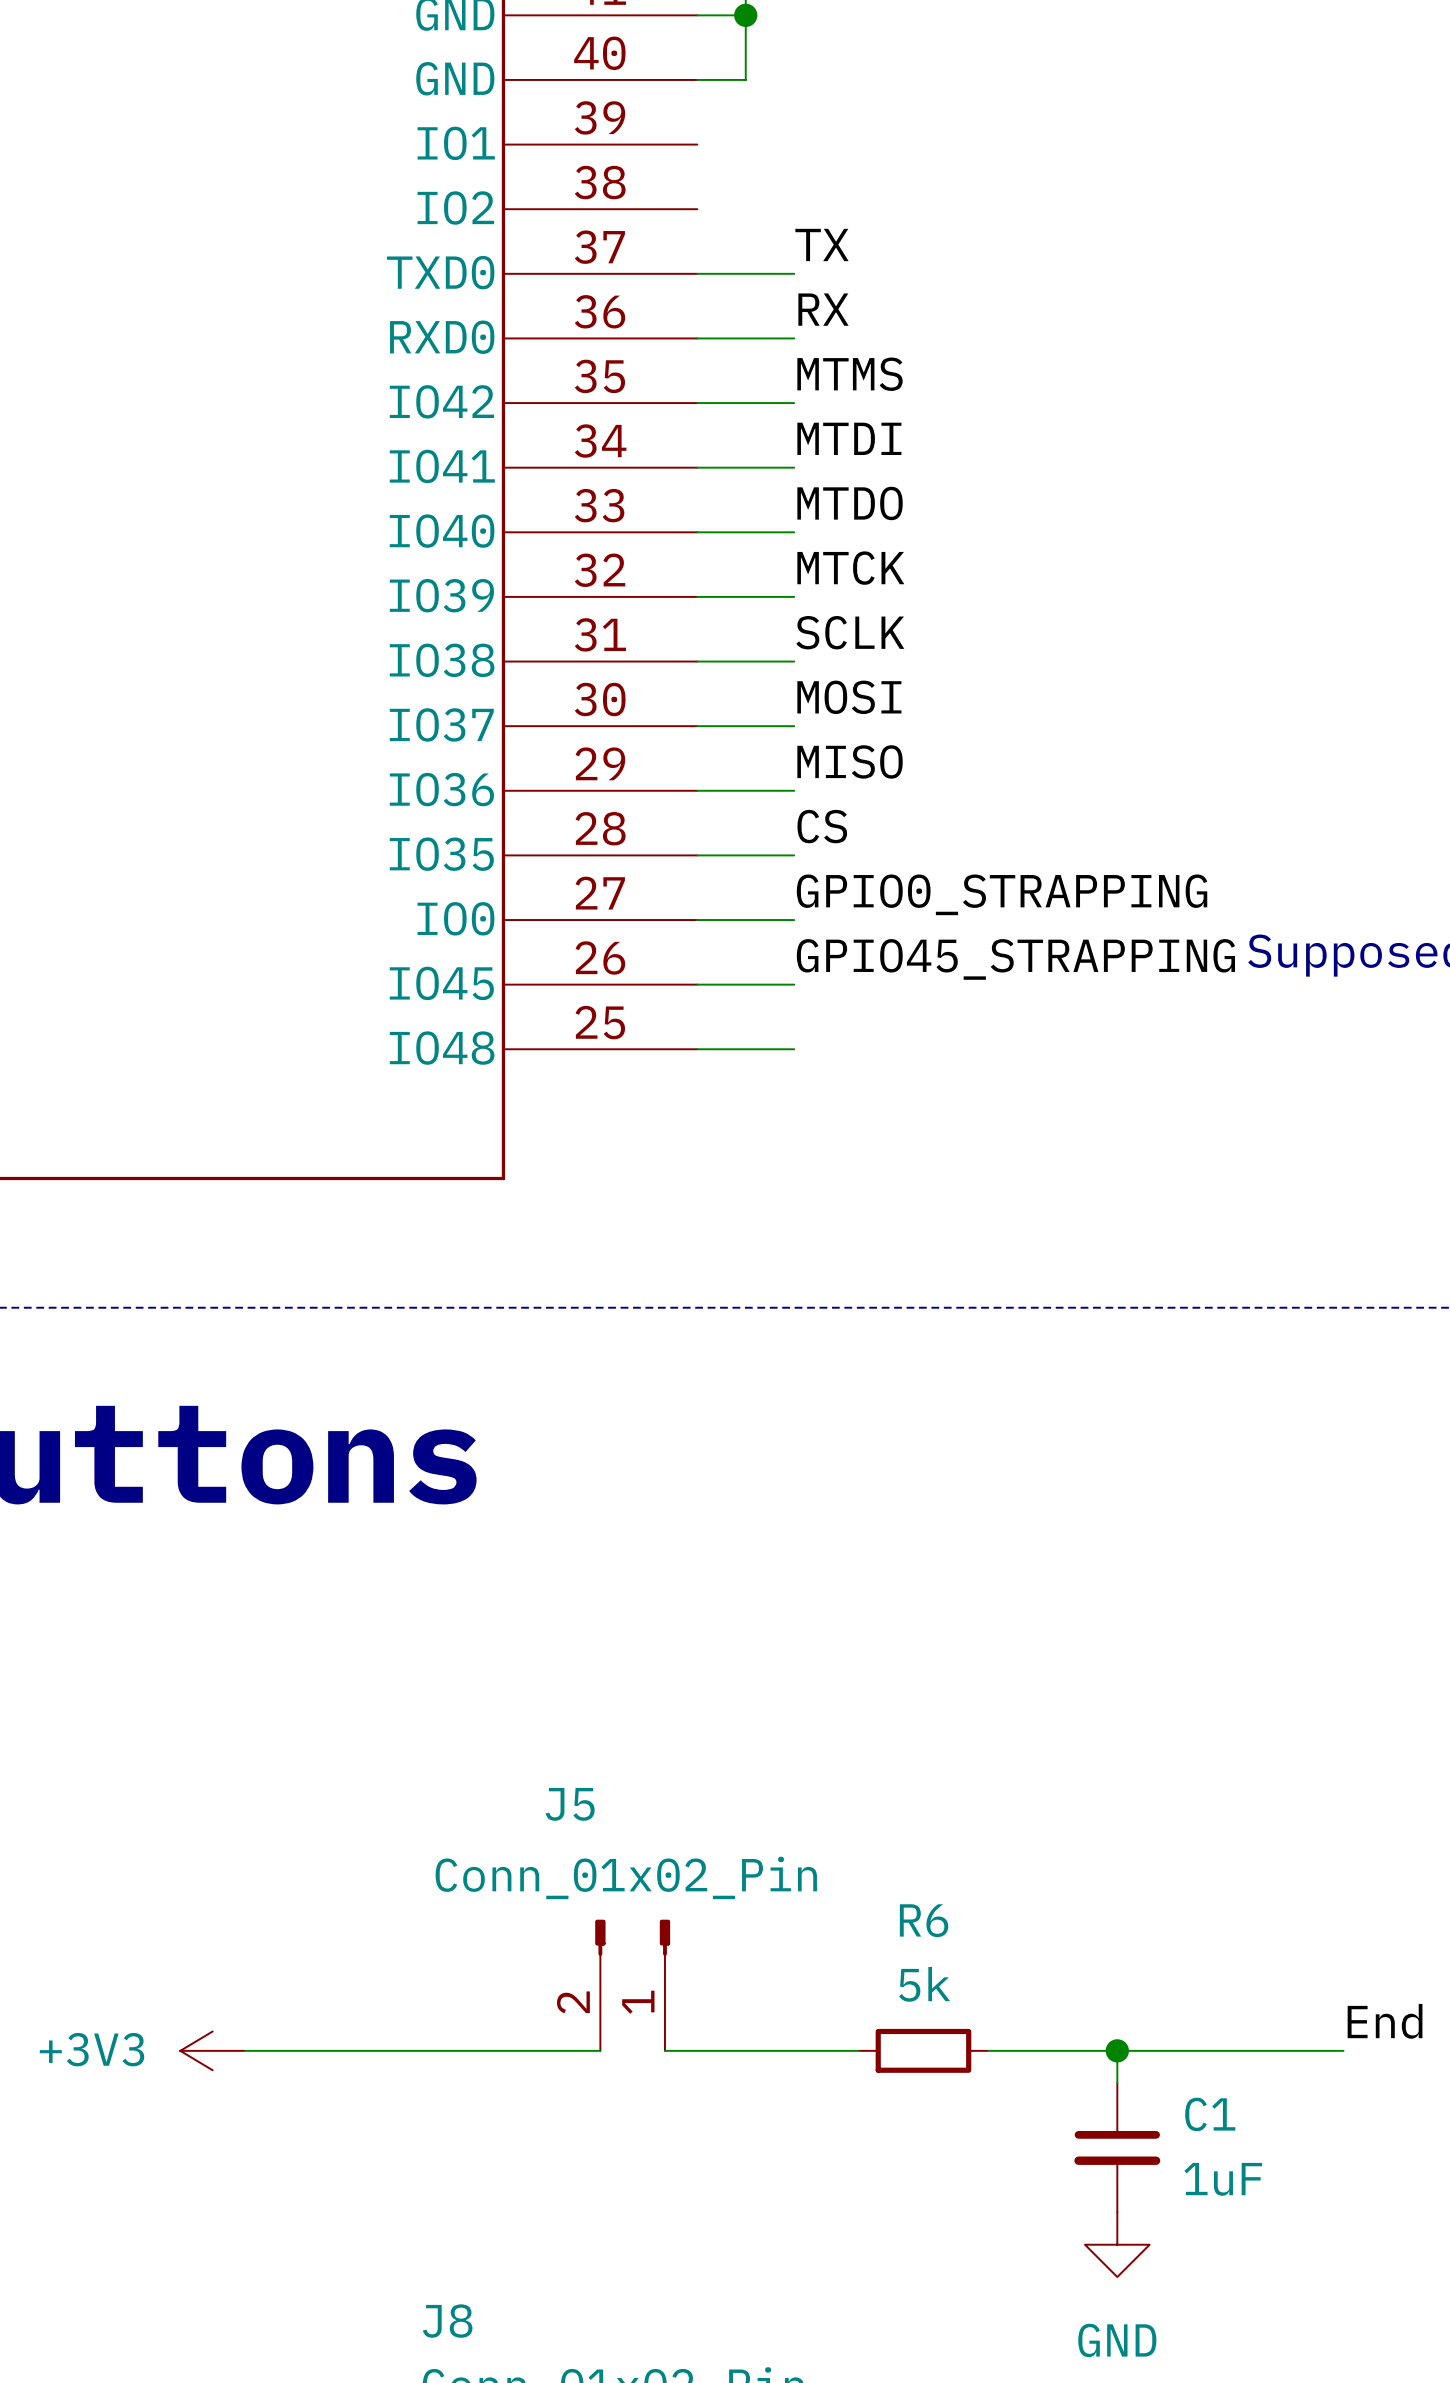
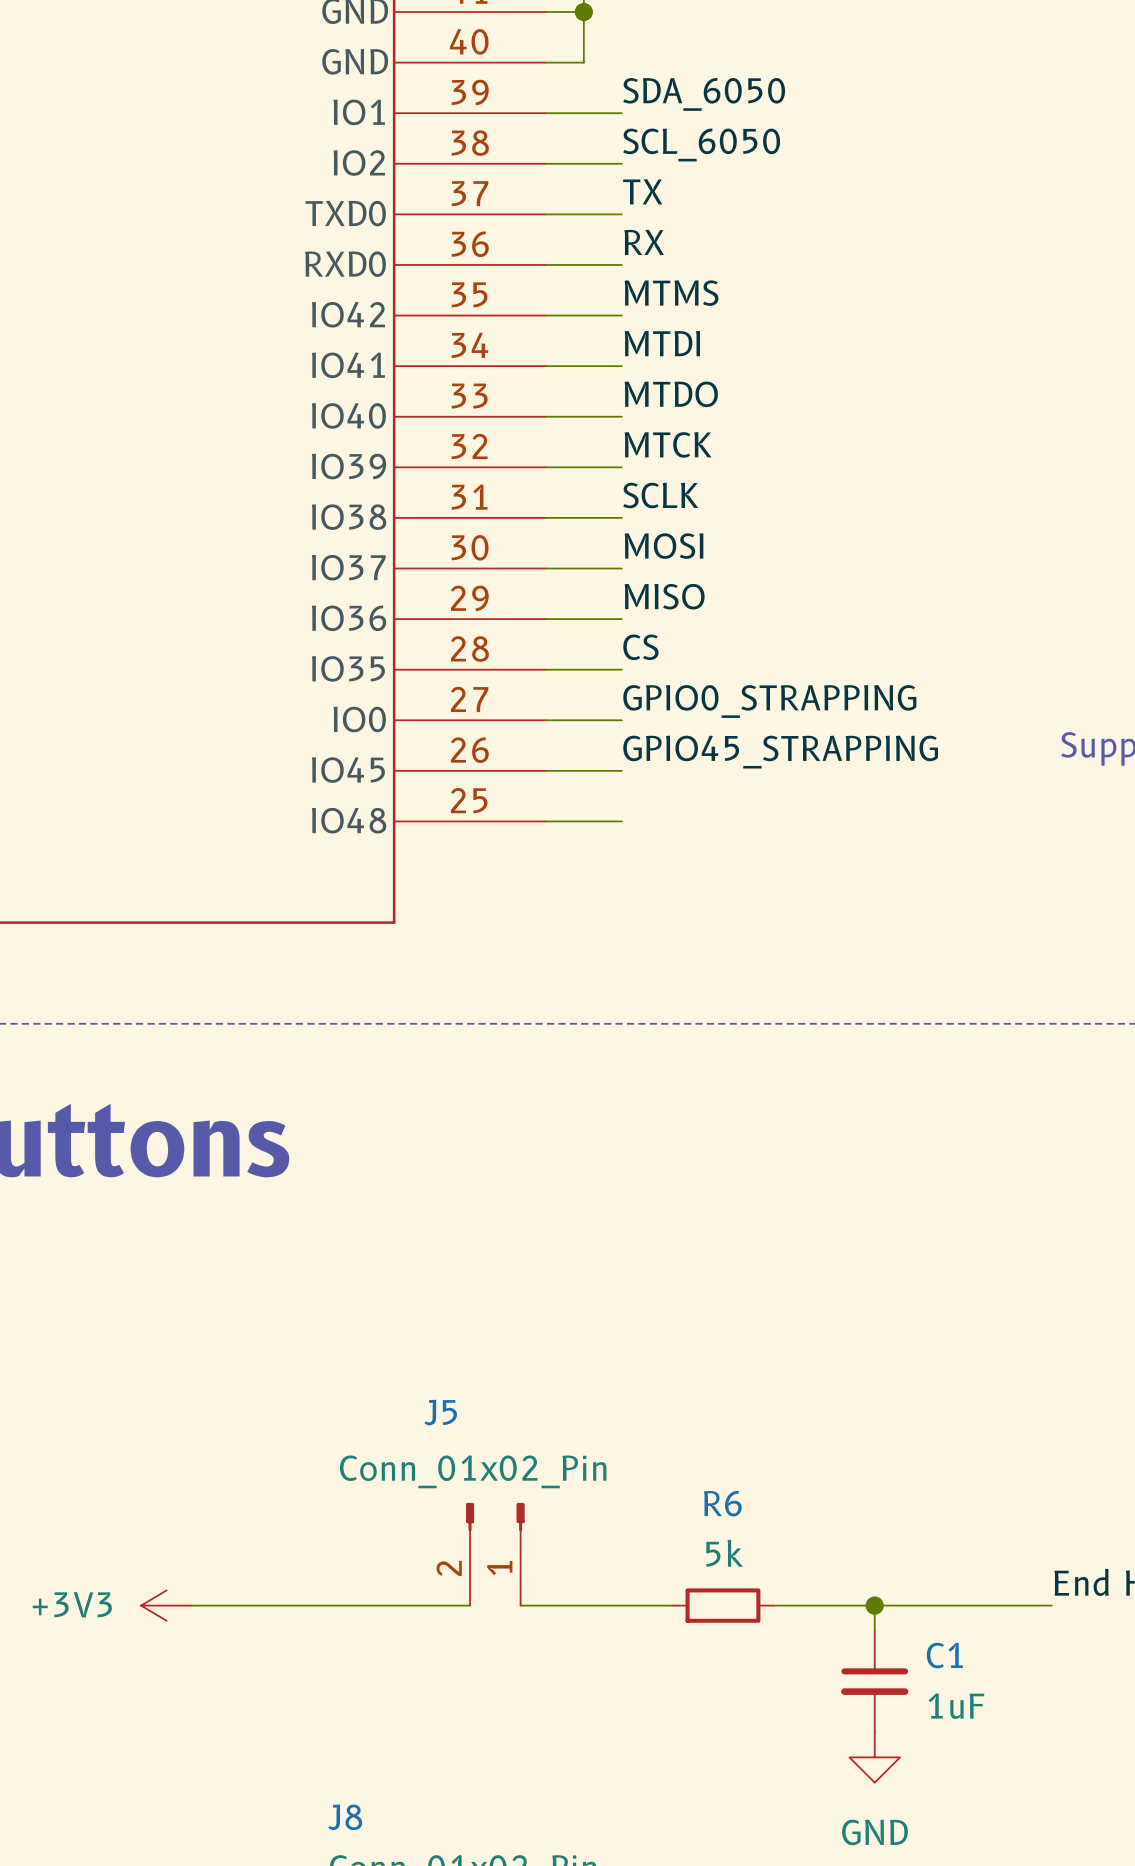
label: none -> SDA_6050 (704, 94)
wire: none -> (545, 113) (621, 113)
label: none -> SCL_6050 (701, 144)
wire: none -> (545, 163) (621, 163)

